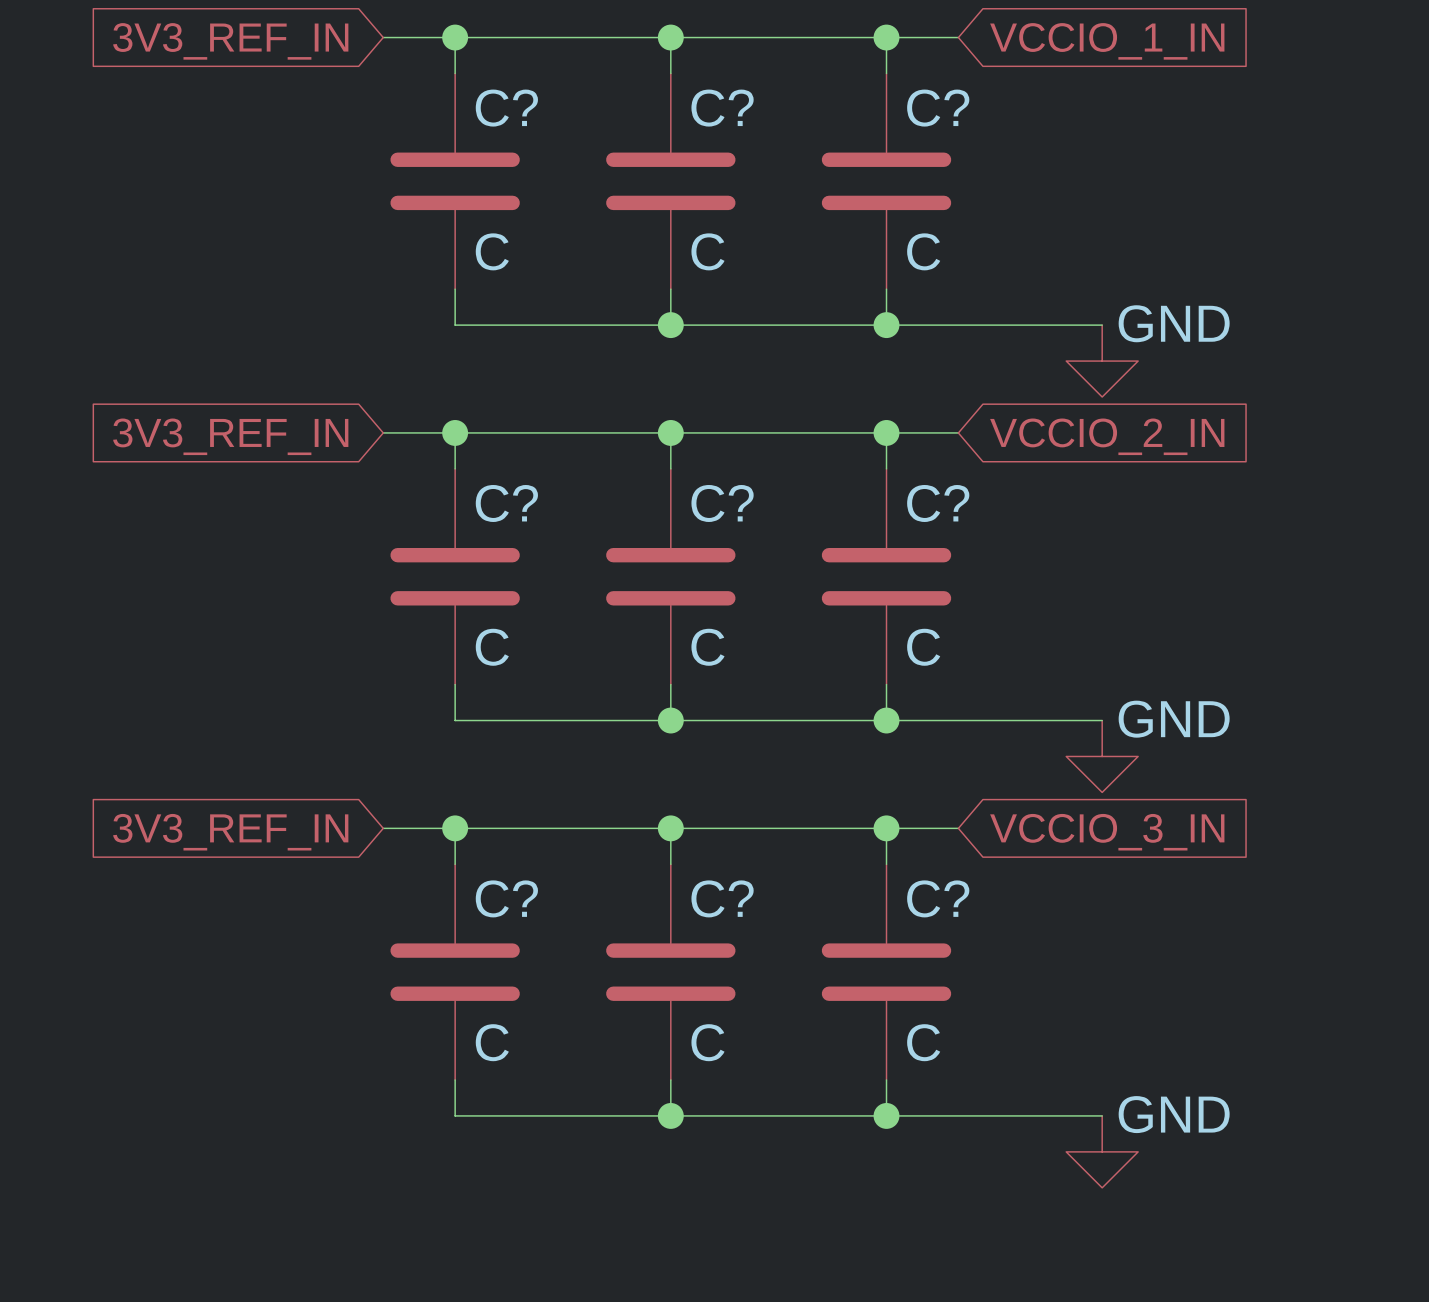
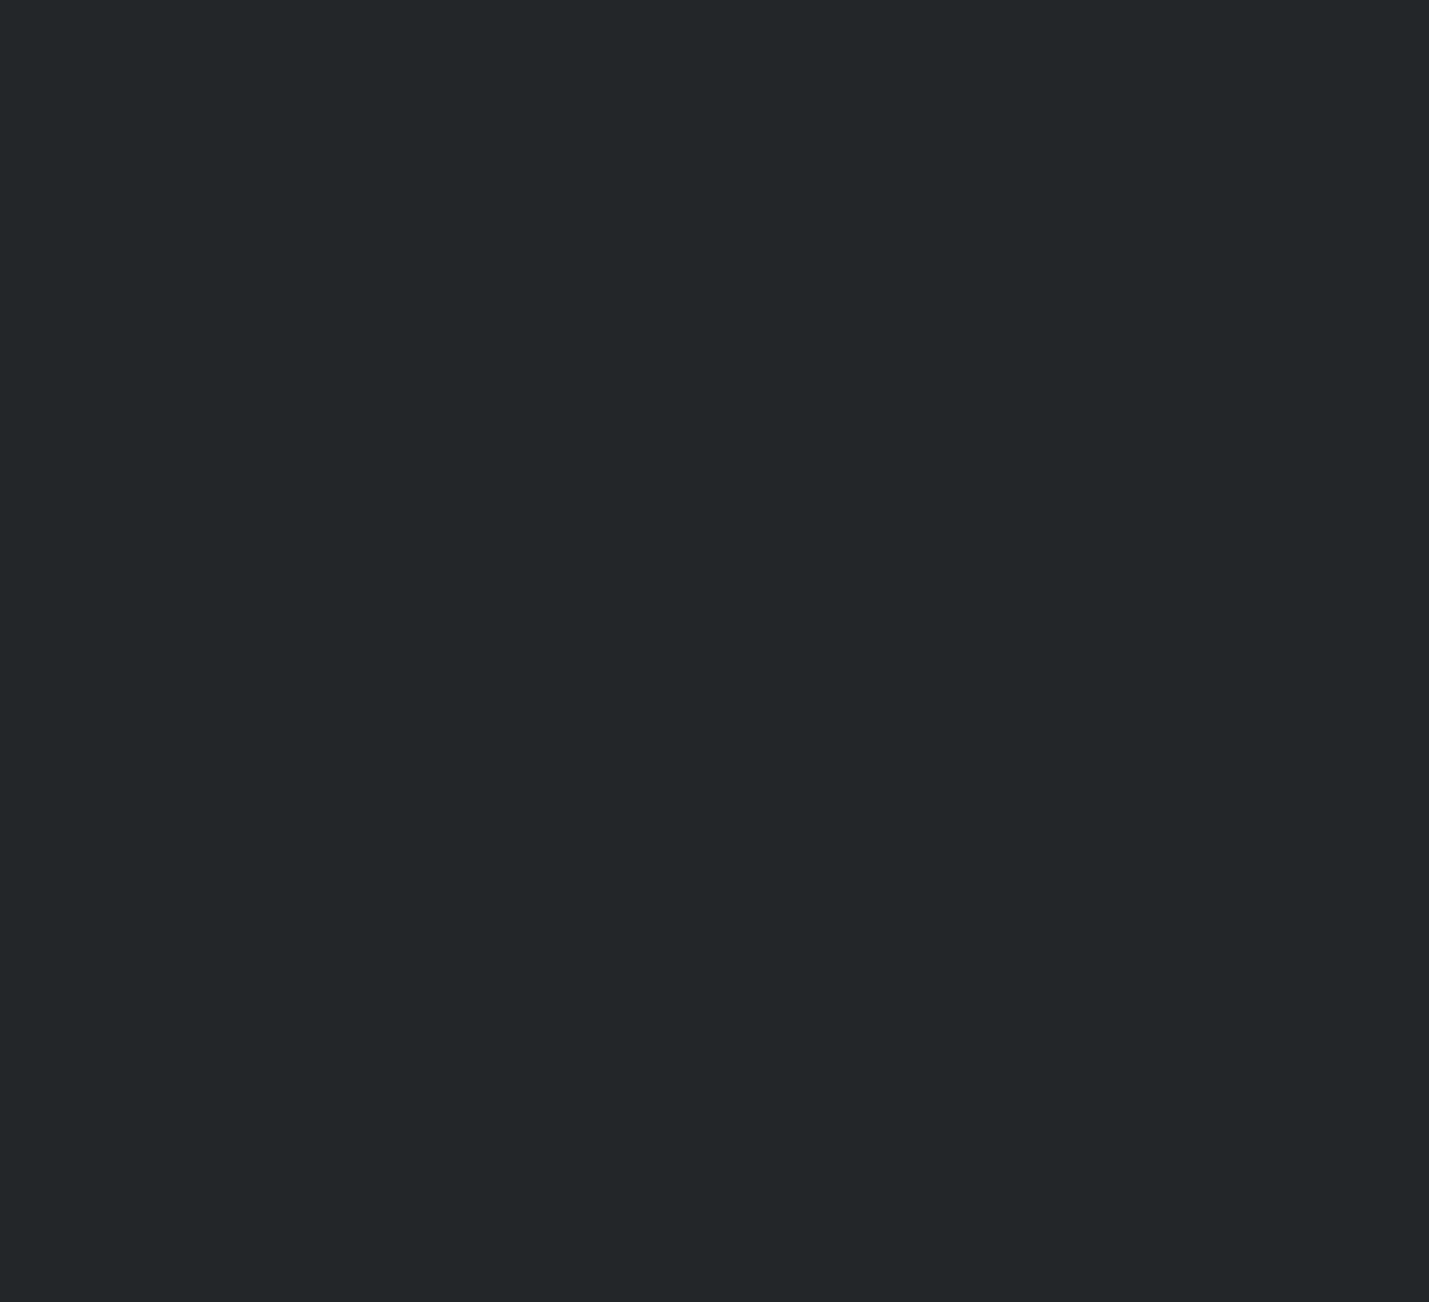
wire: (383, 37) (958, 37) -> none
wire: (455, 37) (455, 73) -> none
junction: (455, 37) -> none
wire: (670, 37) (670, 73) -> none
junction: (670, 37) -> none
wire: (886, 37) (886, 73) -> none
junction: (886, 37) -> none
global label: 3V3_REF_IN (230, 41) -> none
global label: VCCIO_1_IN (1107, 41) -> none
C?: C (455, 181) -> none
C?: C (670, 181) -> none
C?: C (886, 181) -> none
wire: (455, 289) (455, 325) (1102, 325) -> none
wire: (670, 289) (670, 325) -> none
wire: (886, 289) (886, 325) -> none
junction: (670, 325) -> none
junction: (886, 325) -> none
power symbol: GND (1102, 361) -> none
wire: (383, 432) (958, 432) -> none
wire: (455, 432) (455, 468) -> none
junction: (455, 432) -> none
wire: (670, 432) (670, 468) -> none
junction: (670, 432) -> none
wire: (886, 432) (886, 468) -> none
junction: (886, 432) -> none
global label: 3V3_REF_IN (230, 436) -> none
global label: VCCIO_2_IN (1107, 436) -> none
C?: C (455, 576) -> none
C?: C (670, 576) -> none
C?: C (886, 576) -> none
wire: (455, 684) (455, 720) (1102, 720) -> none
wire: (670, 684) (670, 720) -> none
wire: (886, 684) (886, 720) -> none
junction: (670, 720) -> none
junction: (886, 720) -> none
power symbol: GND (1102, 756) -> none
wire: (383, 828) (958, 828) -> none
wire: (455, 828) (455, 864) -> none
junction: (455, 828) -> none
wire: (670, 828) (670, 864) -> none
junction: (670, 828) -> none
wire: (886, 828) (886, 864) -> none
junction: (886, 828) -> none
global label: 3V3_REF_IN (230, 832) -> none
global label: VCCIO_3_IN (1107, 832) -> none
C?: C (455, 972) -> none
C?: C (670, 972) -> none
C?: C (886, 972) -> none
wire: (455, 1079) (455, 1115) (1102, 1115) -> none
wire: (670, 1079) (670, 1115) -> none
wire: (886, 1079) (886, 1115) -> none
junction: (670, 1115) -> none
junction: (886, 1115) -> none
power symbol: GND (1102, 1151) -> none

